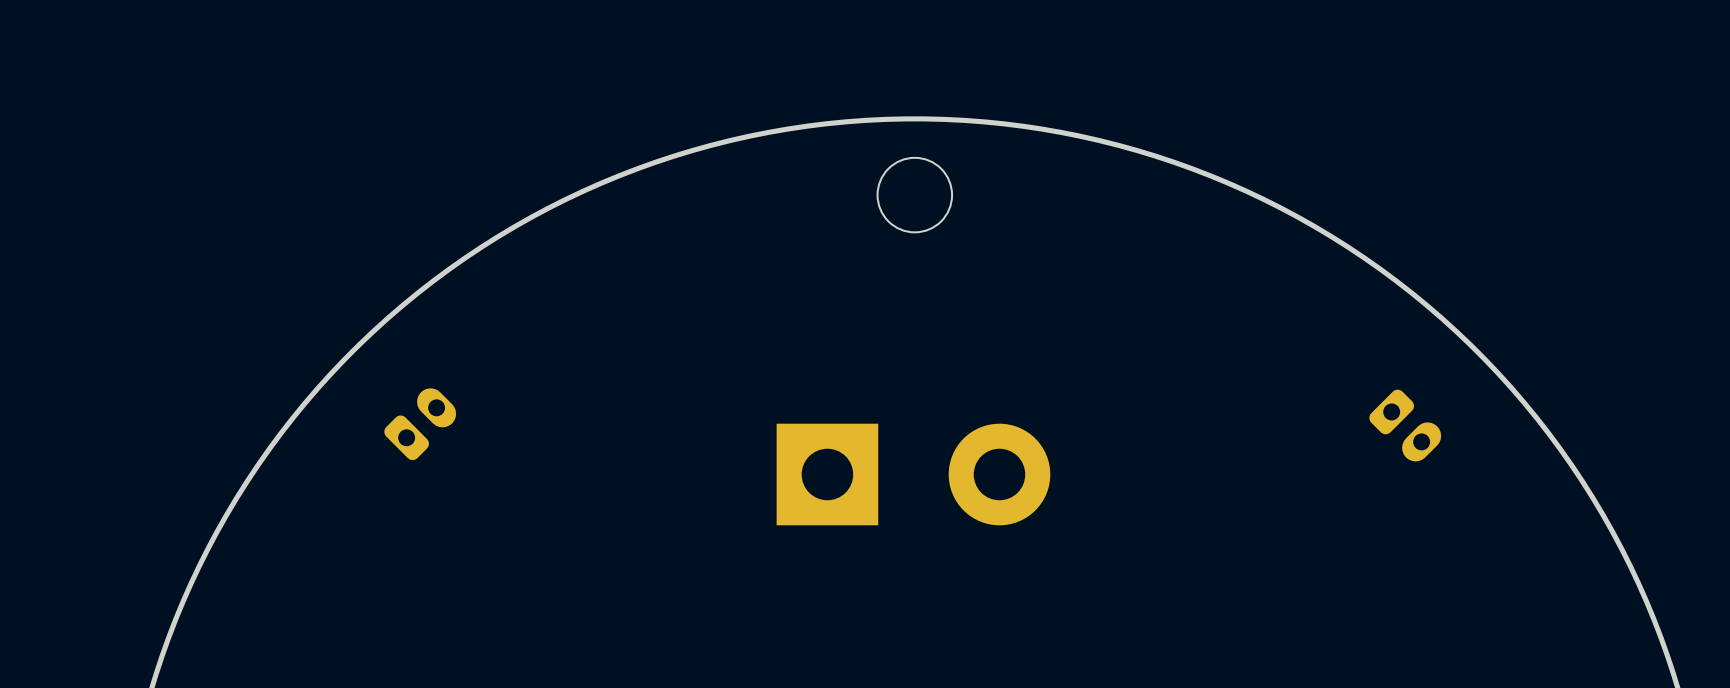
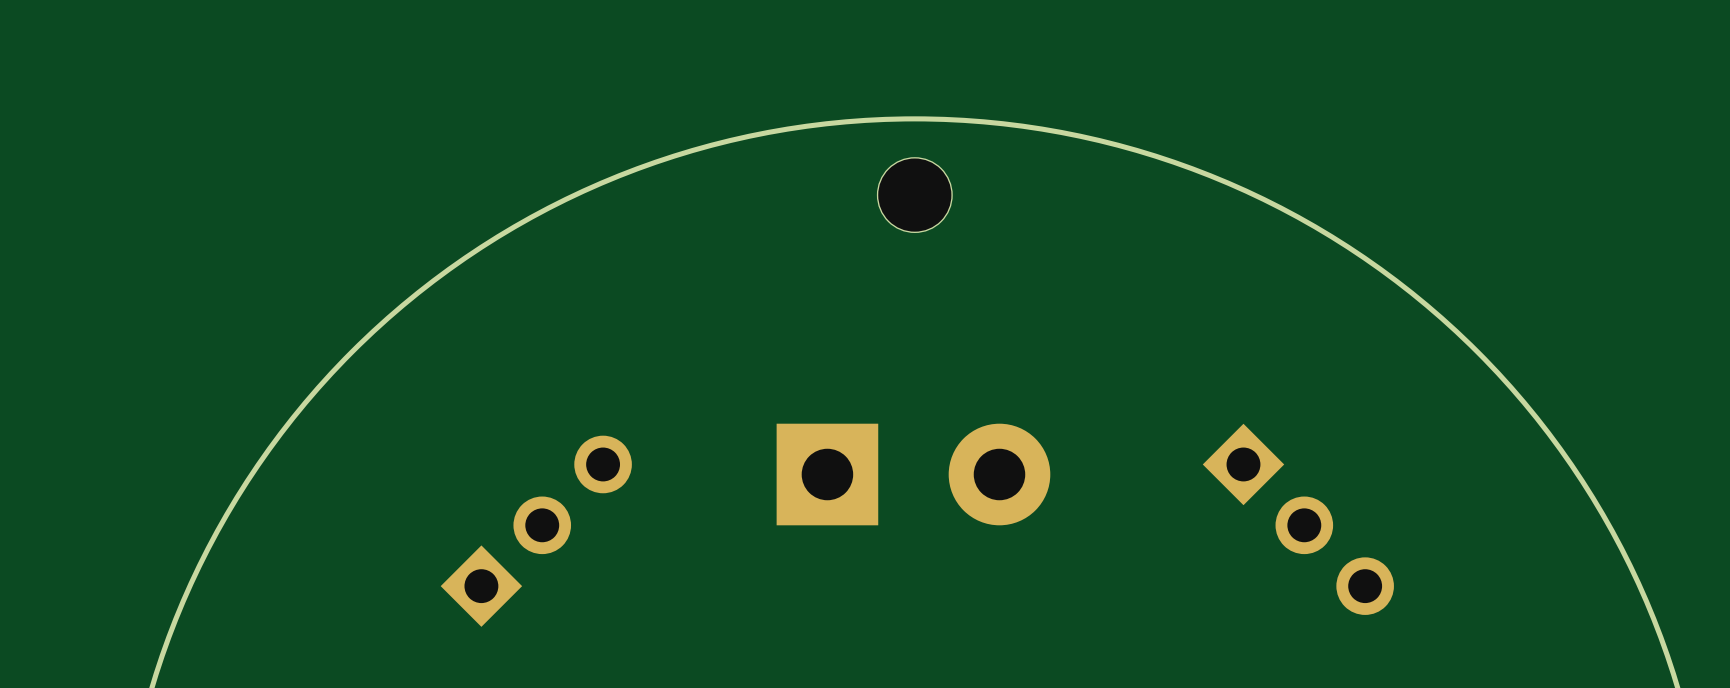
part: (420, 424) -> none
part: (1405, 425) -> none
part: none -> (1298, 519)
part: none -> (536, 531)

